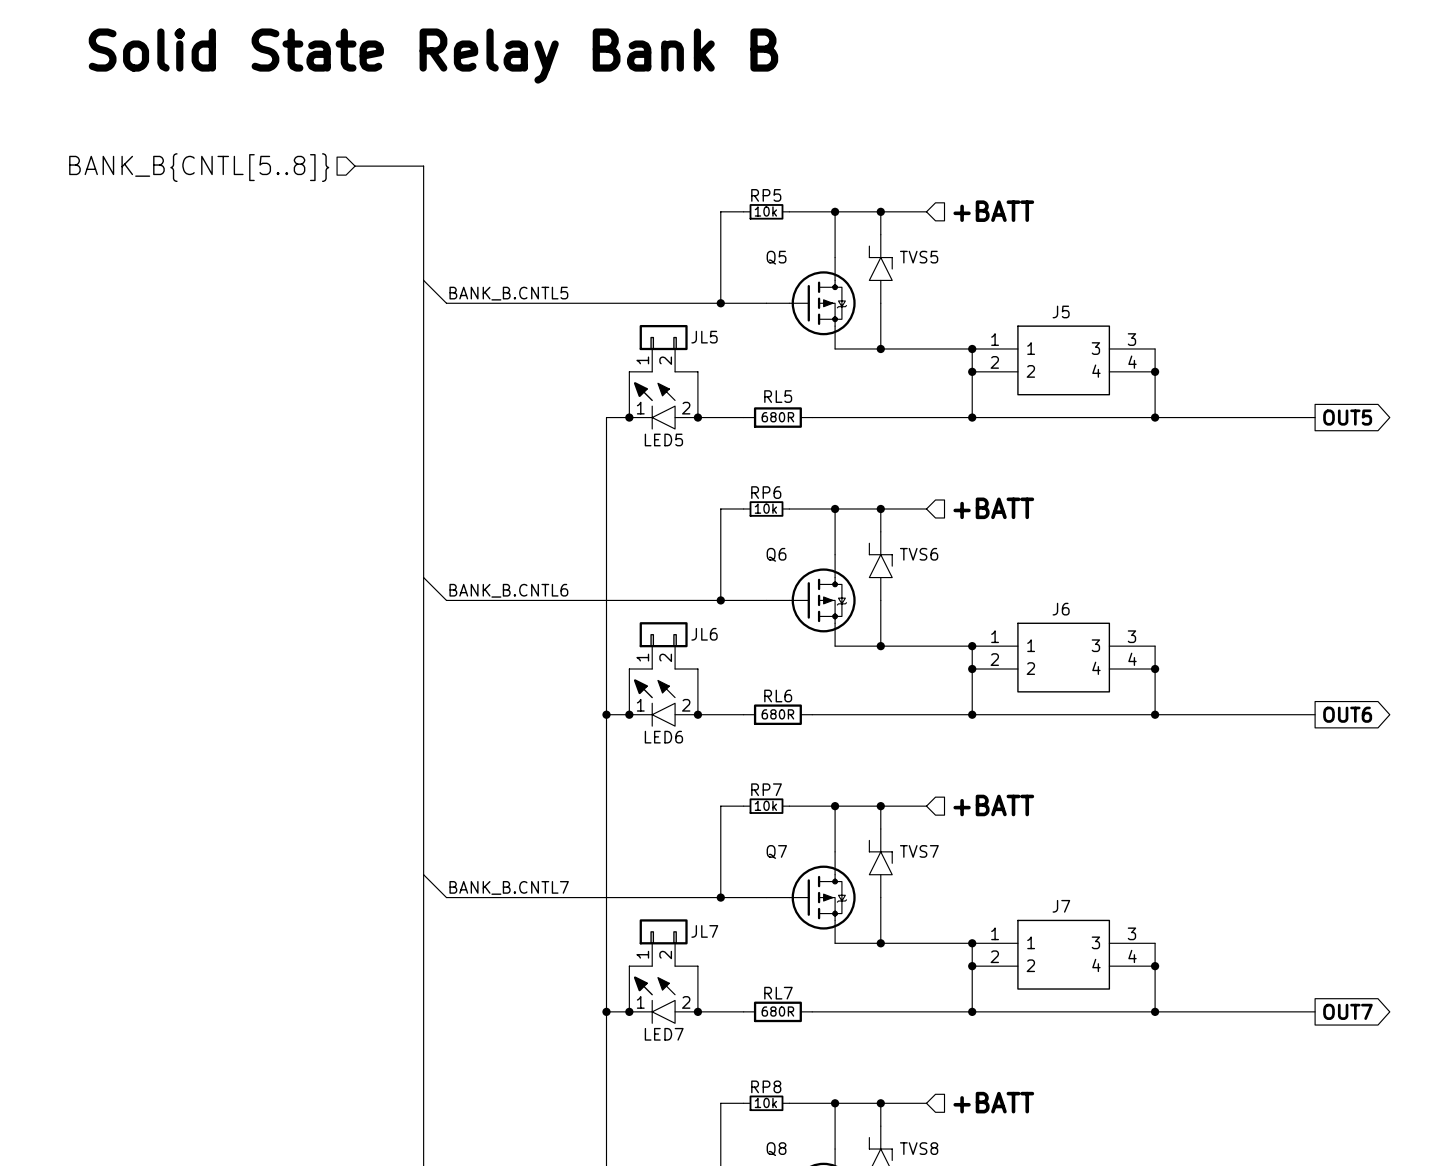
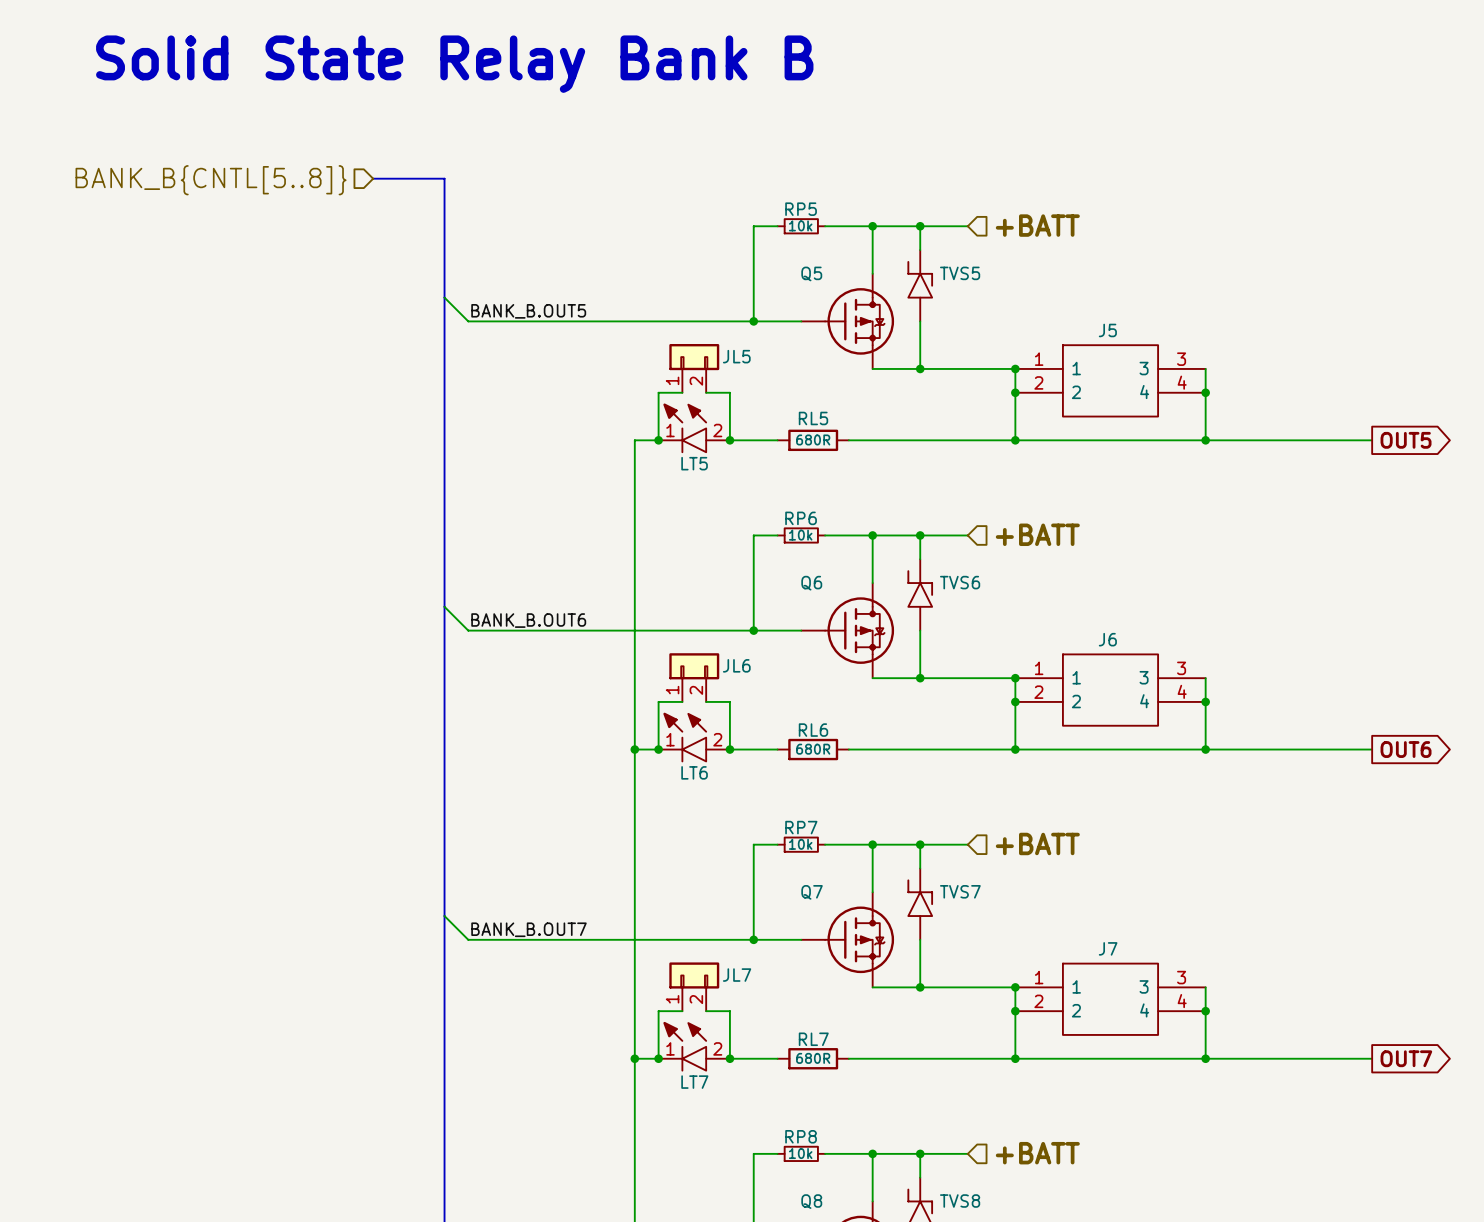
label: BANK_B.CNTL5 (508, 293) -> BANK_B.OUT5 (528, 311)
LED5 name: LED5 (663, 439) -> LT5 (694, 463)
label: BANK_B.CNTL6 (508, 590) -> BANK_B.OUT6 (528, 620)
LED6 name: LED6 (663, 737) -> LT6 (694, 772)
label: BANK_B.CNTL7 (509, 887) -> BANK_B.OUT7 (529, 929)
LED7 name: LED7 (664, 1034) -> LT7 (694, 1082)

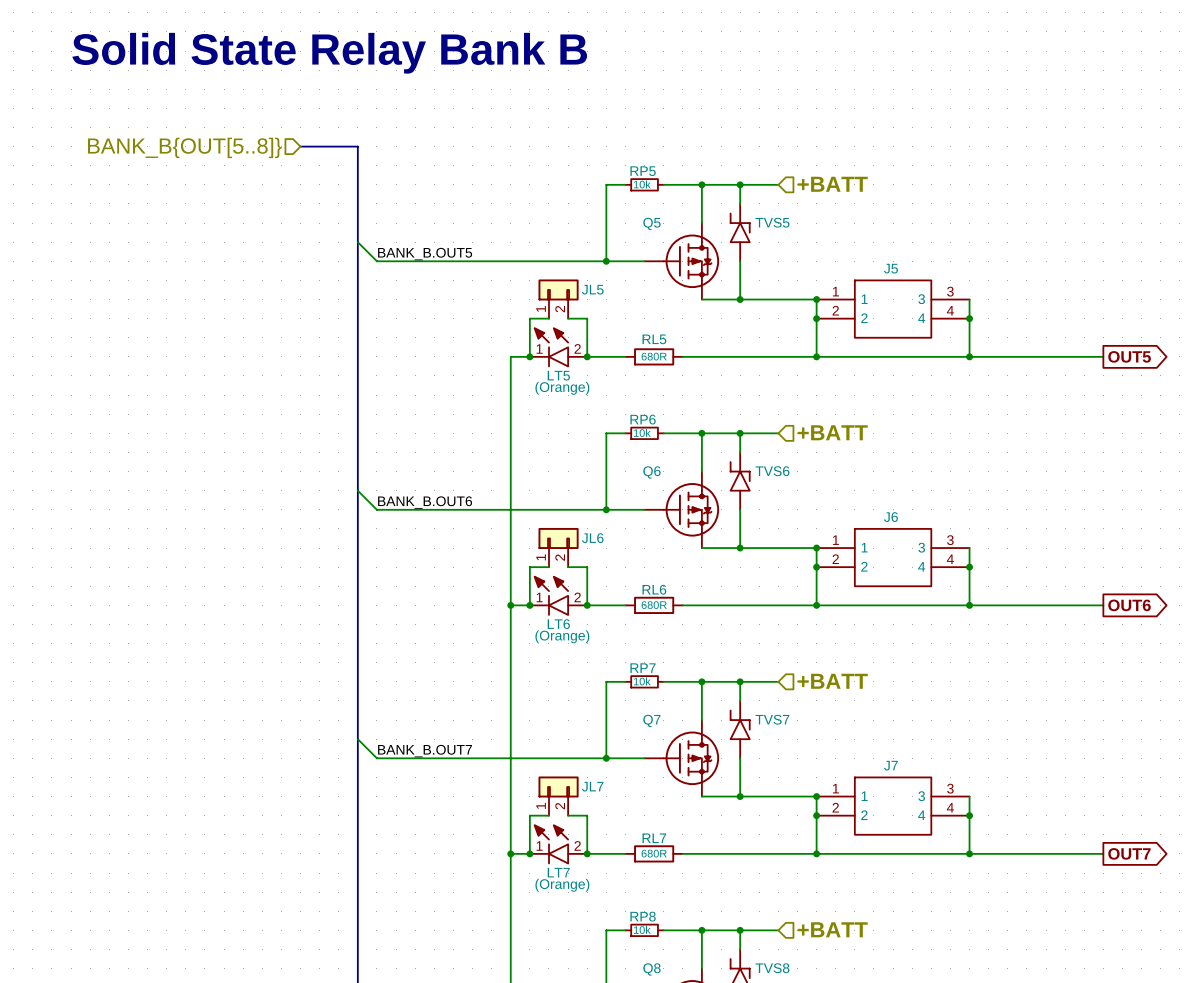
hierarchical label: BANK_B{CNTL[5..8]} (211, 180) -> BANK_B{OUT[5..8]} (184, 147)
LT5 text: none -> (Orange) (562, 388)
LT6 text: none -> (Orange) (562, 636)
LT7 text: none -> (Orange) (562, 885)

